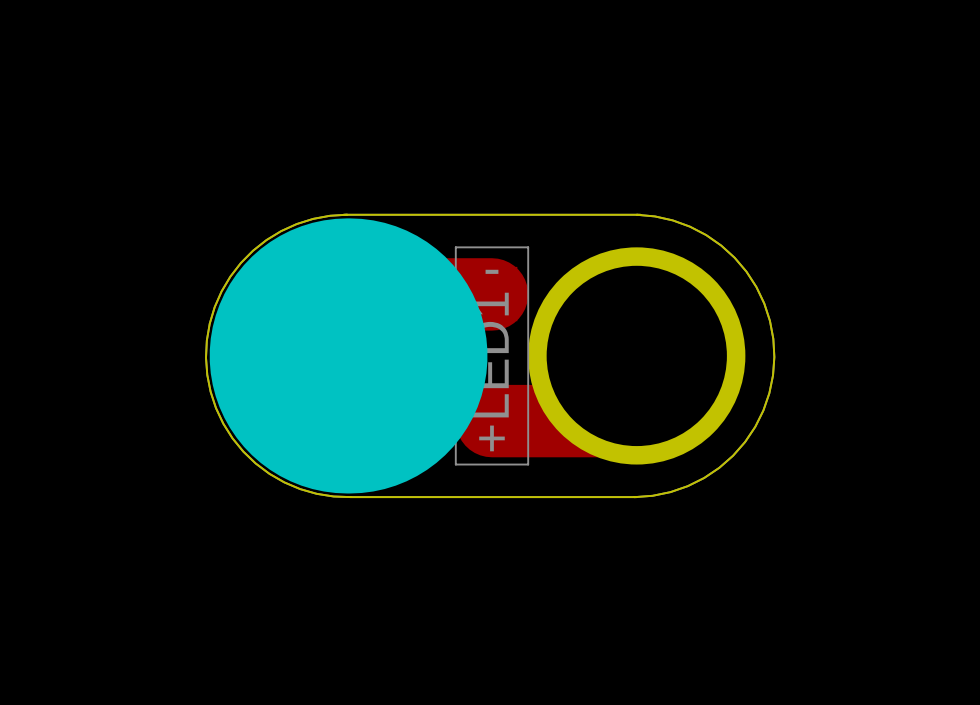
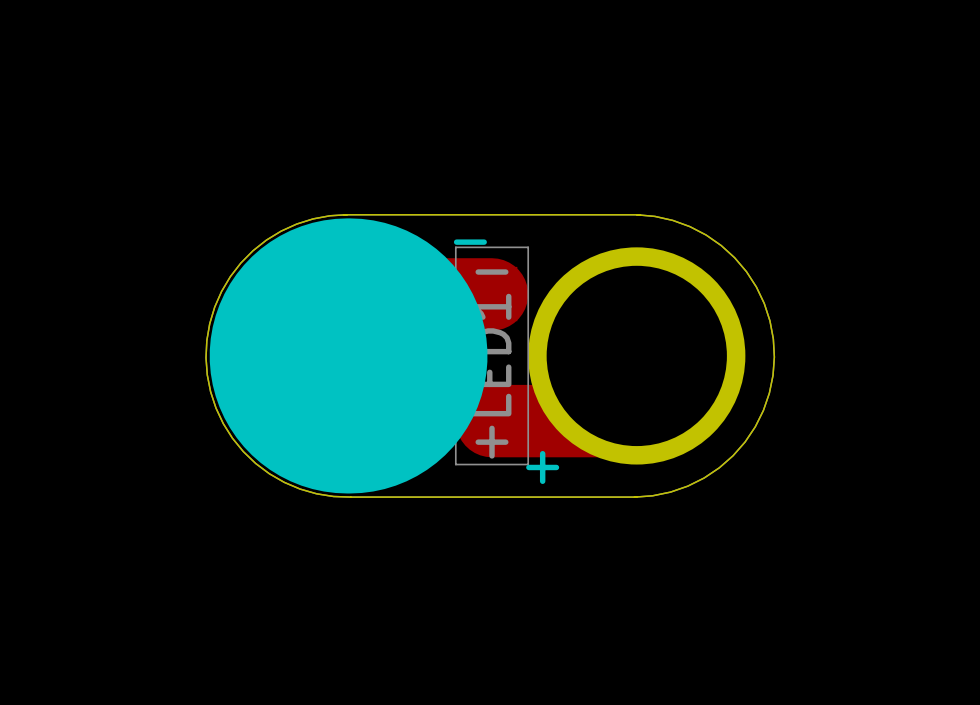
LED1 text: none -> - (470, 242)
LED1 text: none -> + (542, 467)

